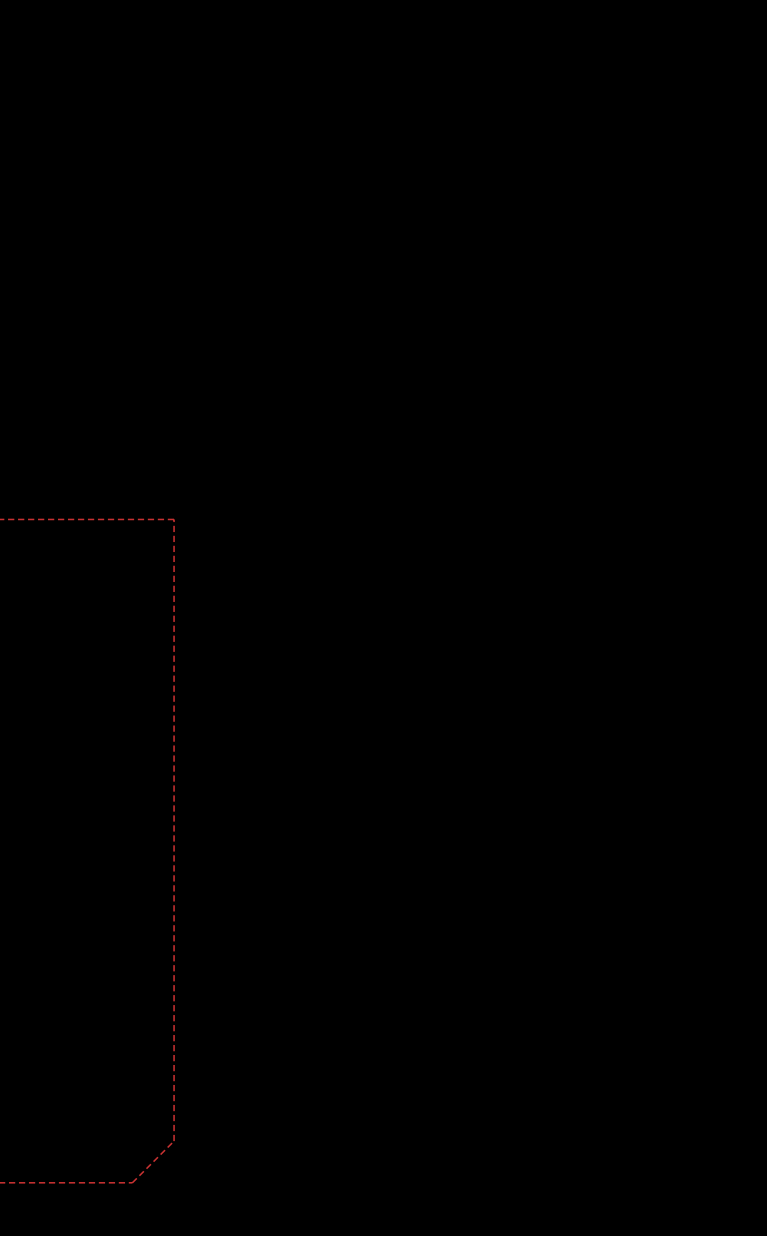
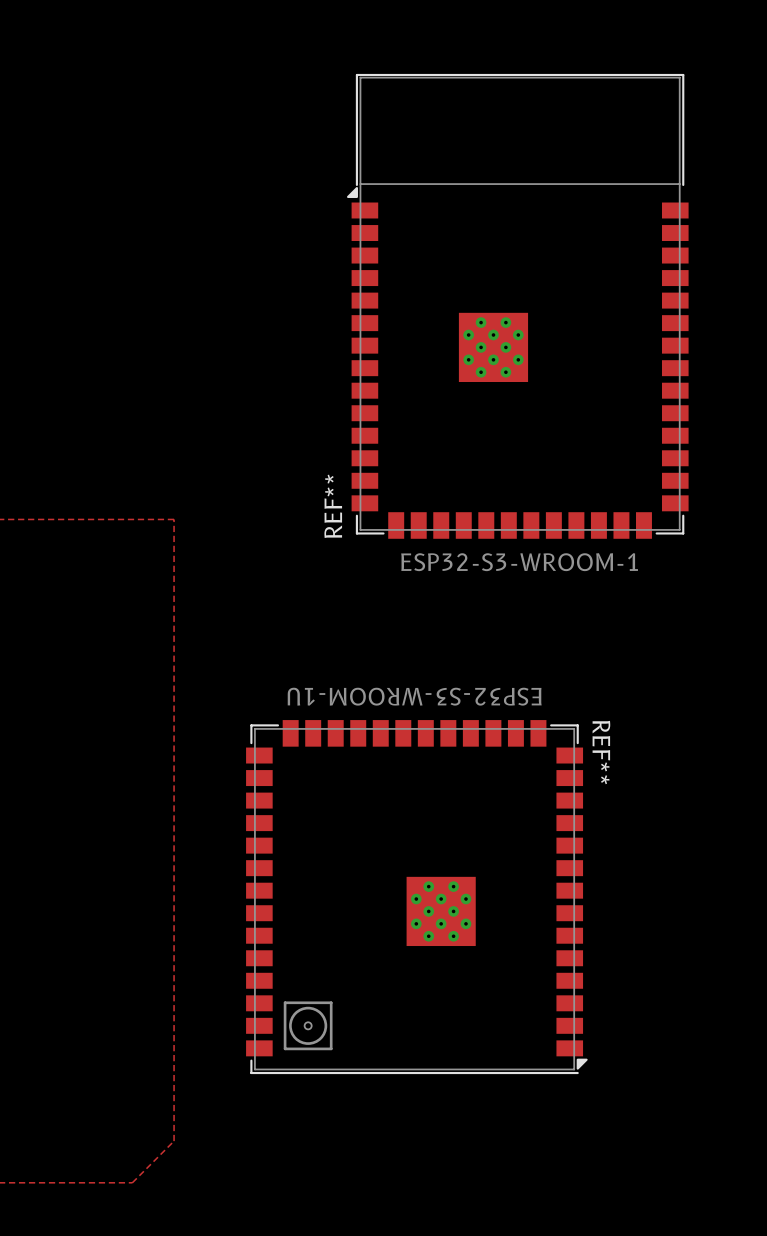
REF**: none -> ESP32-S3-WROOM-1 (517, 306)
REF**: none -> ESP32-S3-WROOM-1U (416, 897)

